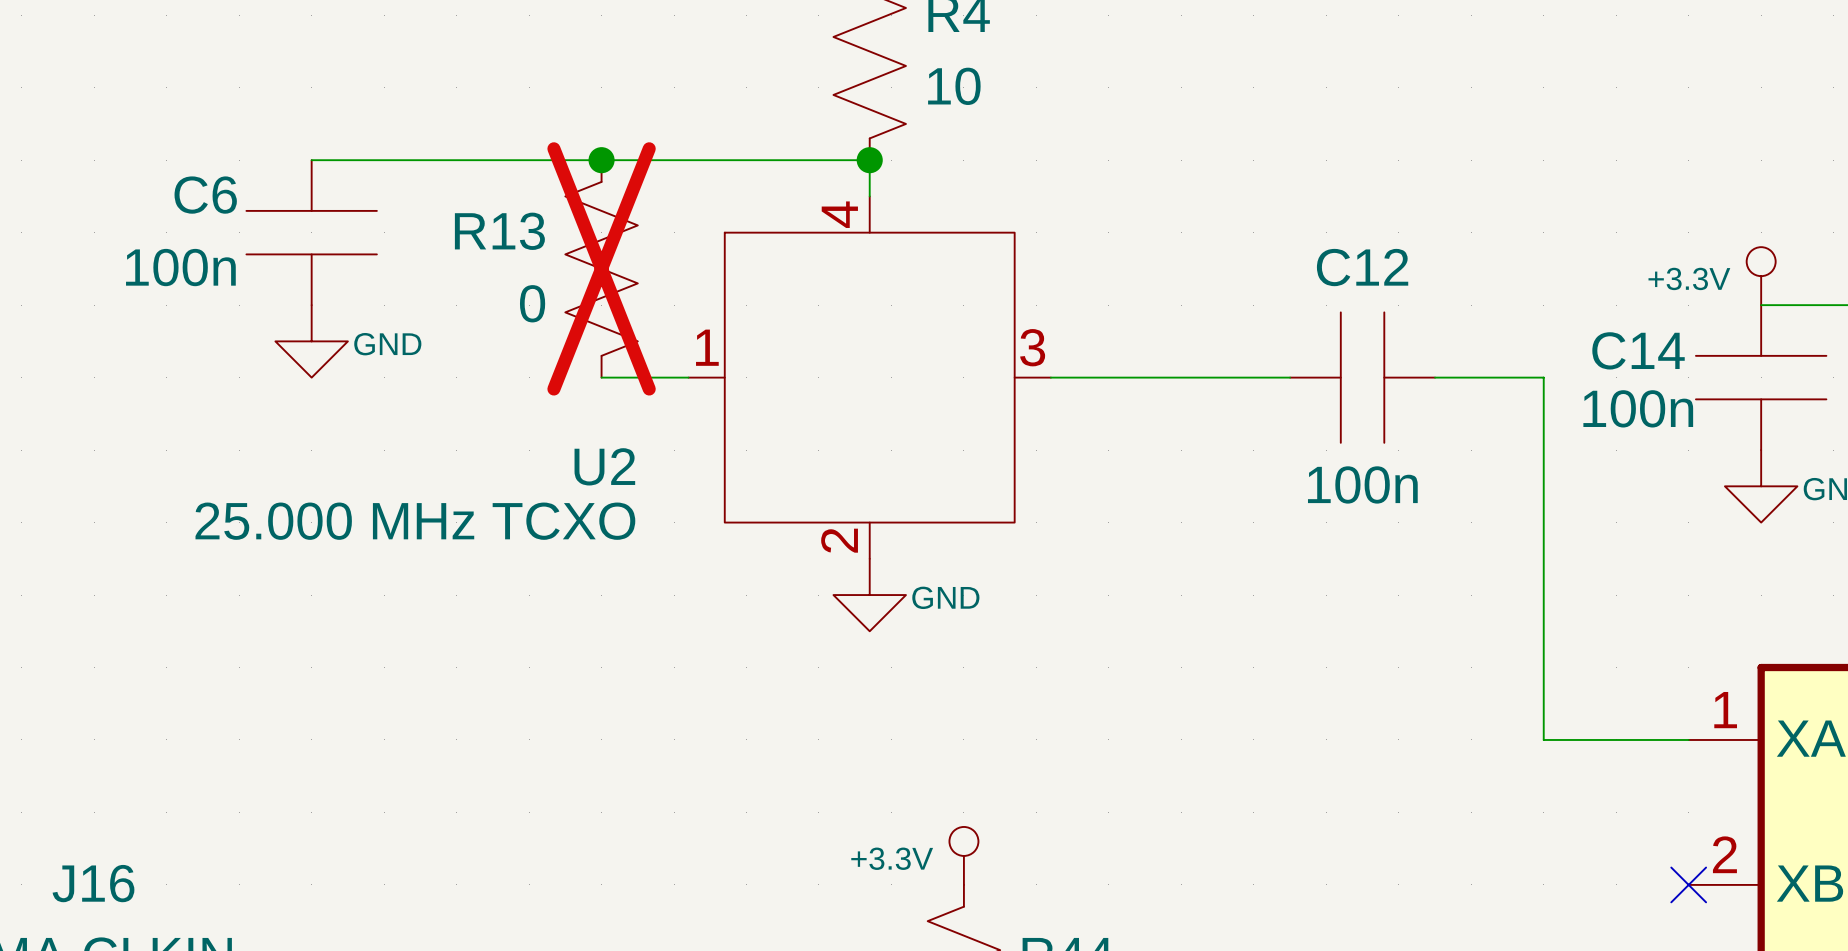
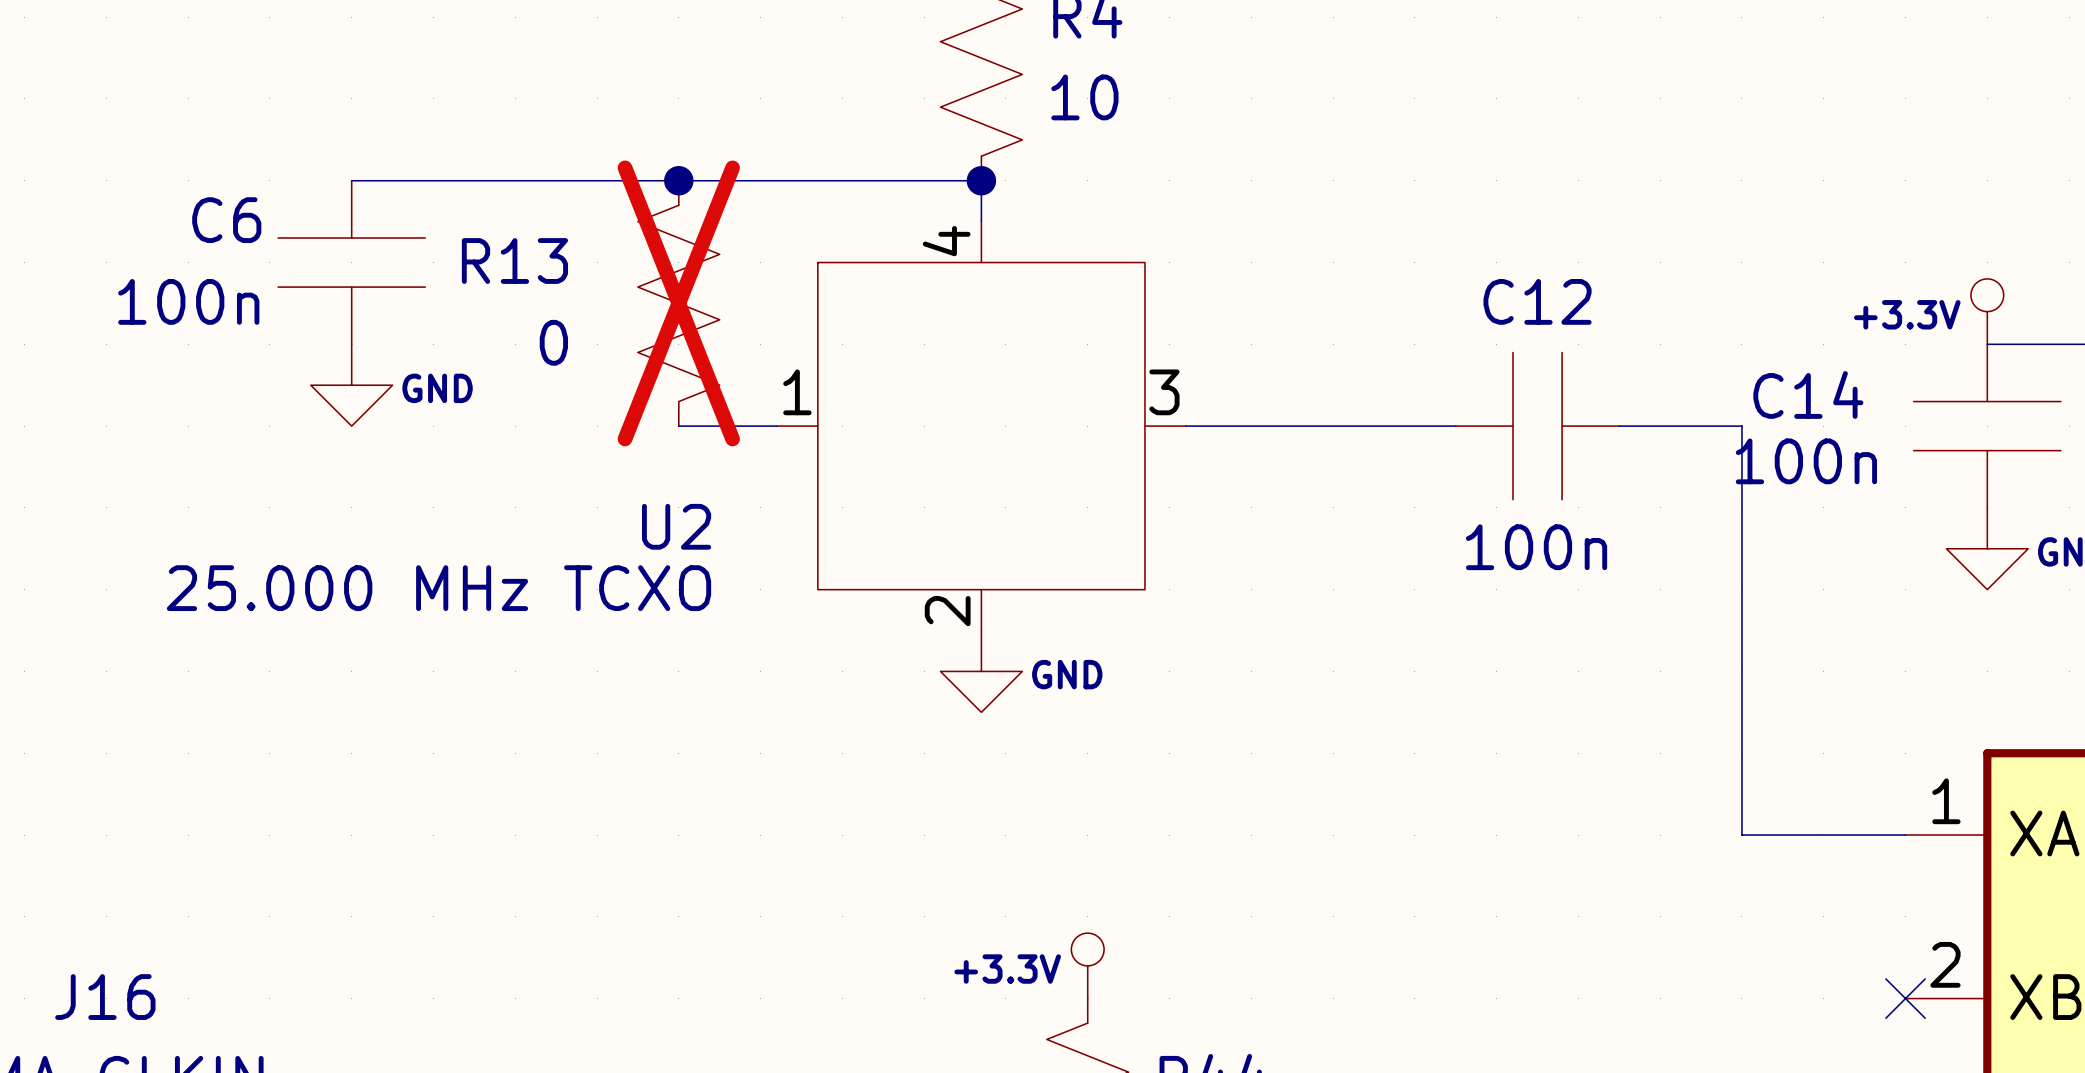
R13 name position: R13 (499, 231) -> R13 (514, 261)
R13 value position: 0 (532, 303) -> 0 (553, 342)
C14 name position: C14 (1638, 350) -> C14 (1808, 394)
C14 value position: 100n (1638, 408) -> 100n (1806, 461)

